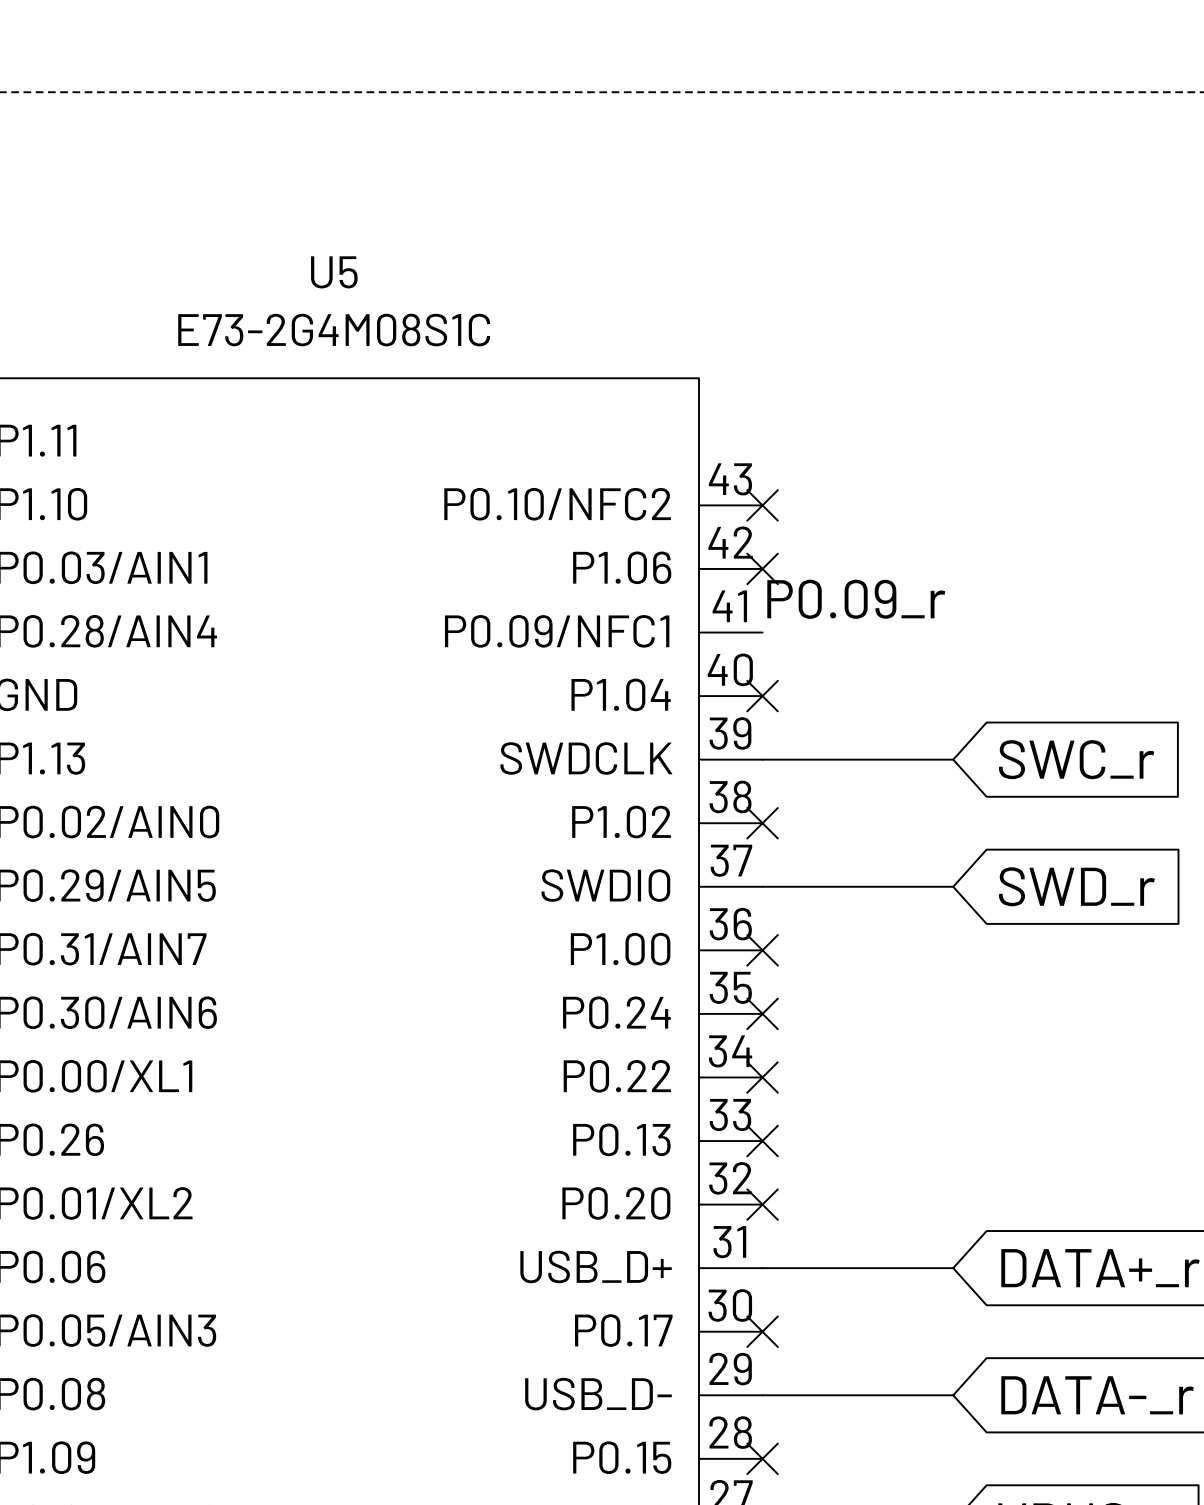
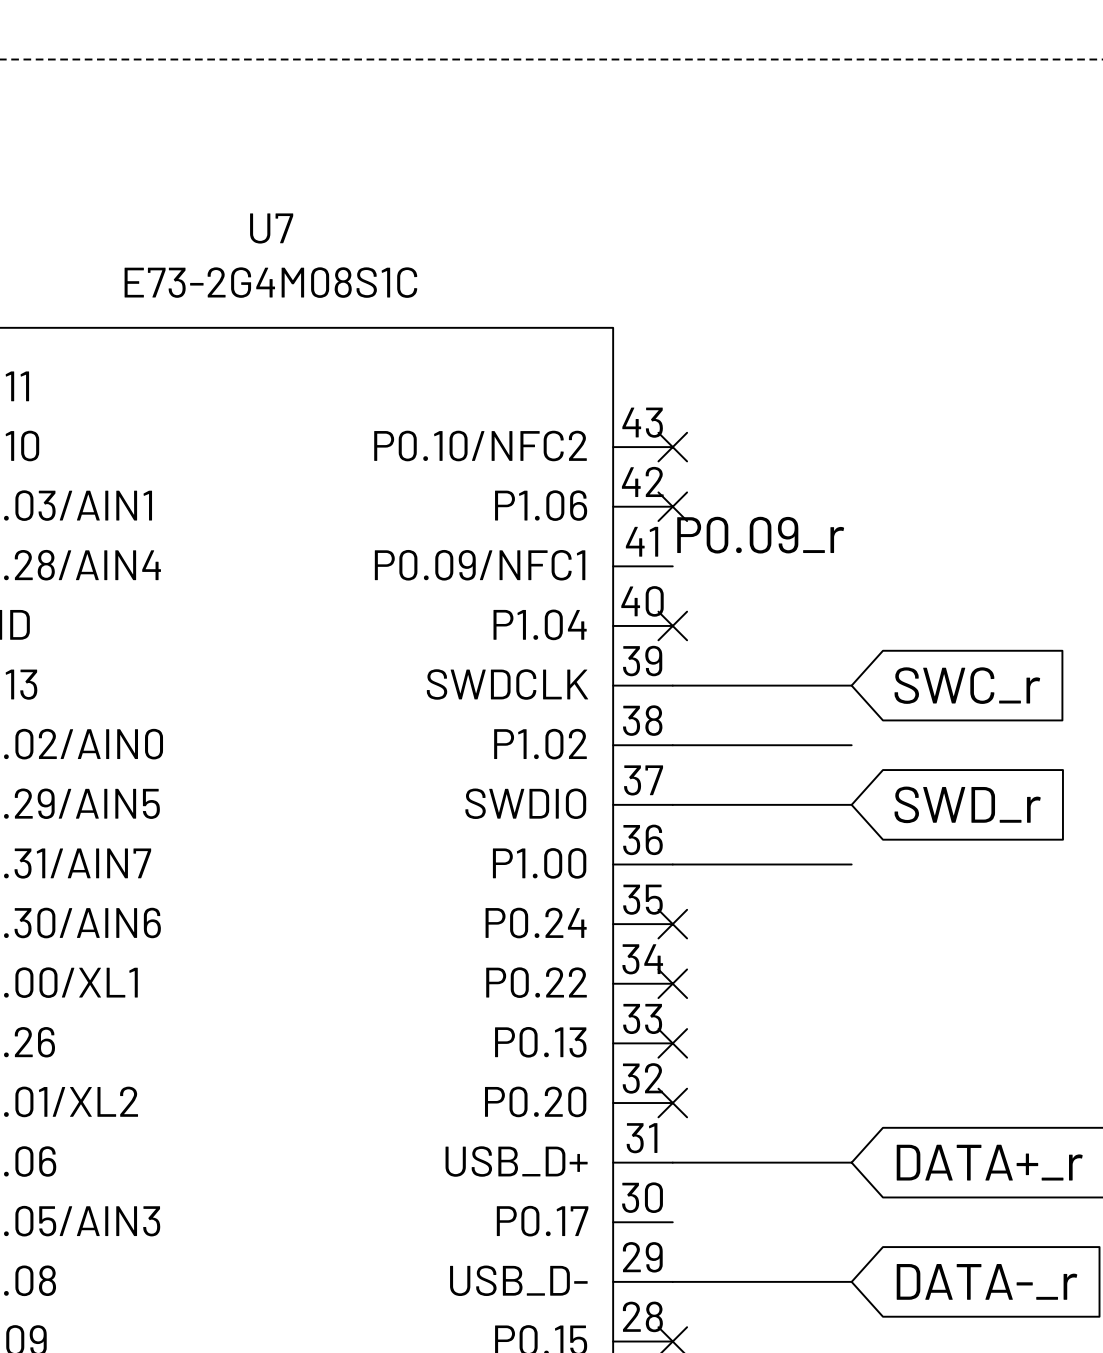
U5 name: U5 (334, 272) -> U7 (271, 228)
wire: none -> (672, 745) (851, 745)
no-connect mark: (762, 823) -> none
wire: none -> (672, 864) (851, 864)
no-connect mark: (762, 950) -> none
no-connect mark: (762, 1331) -> none

